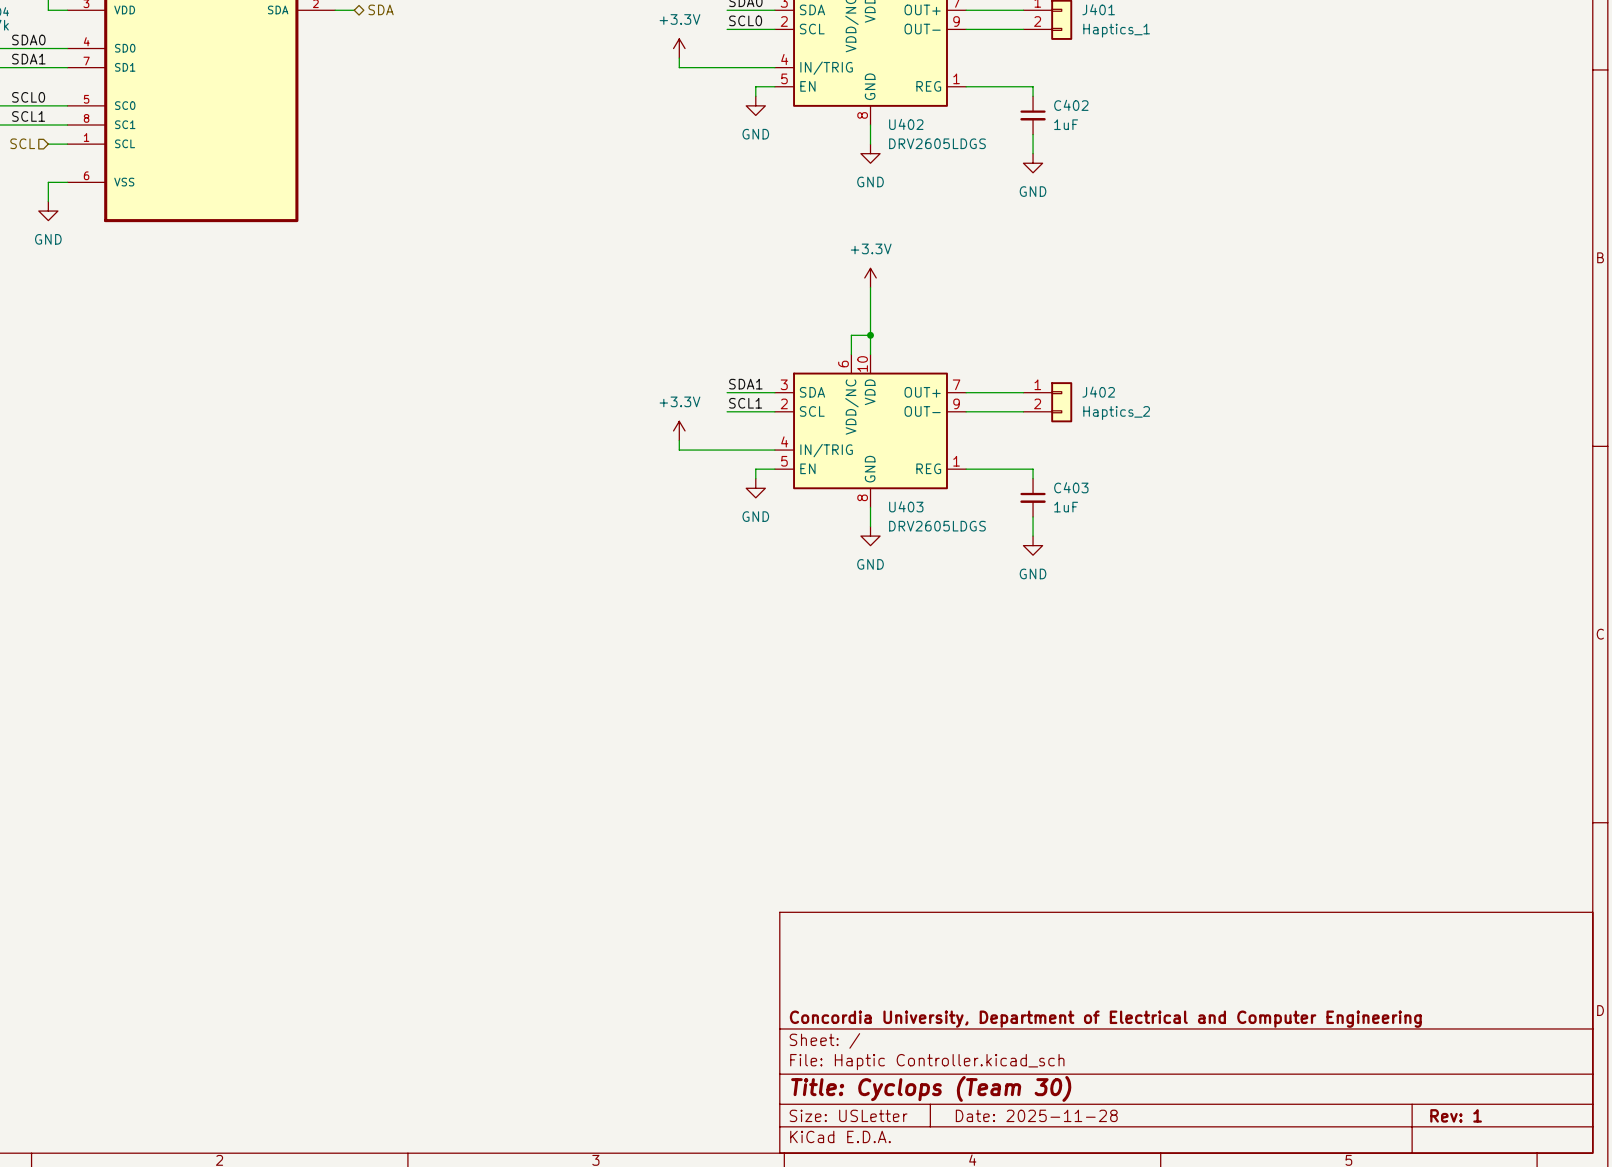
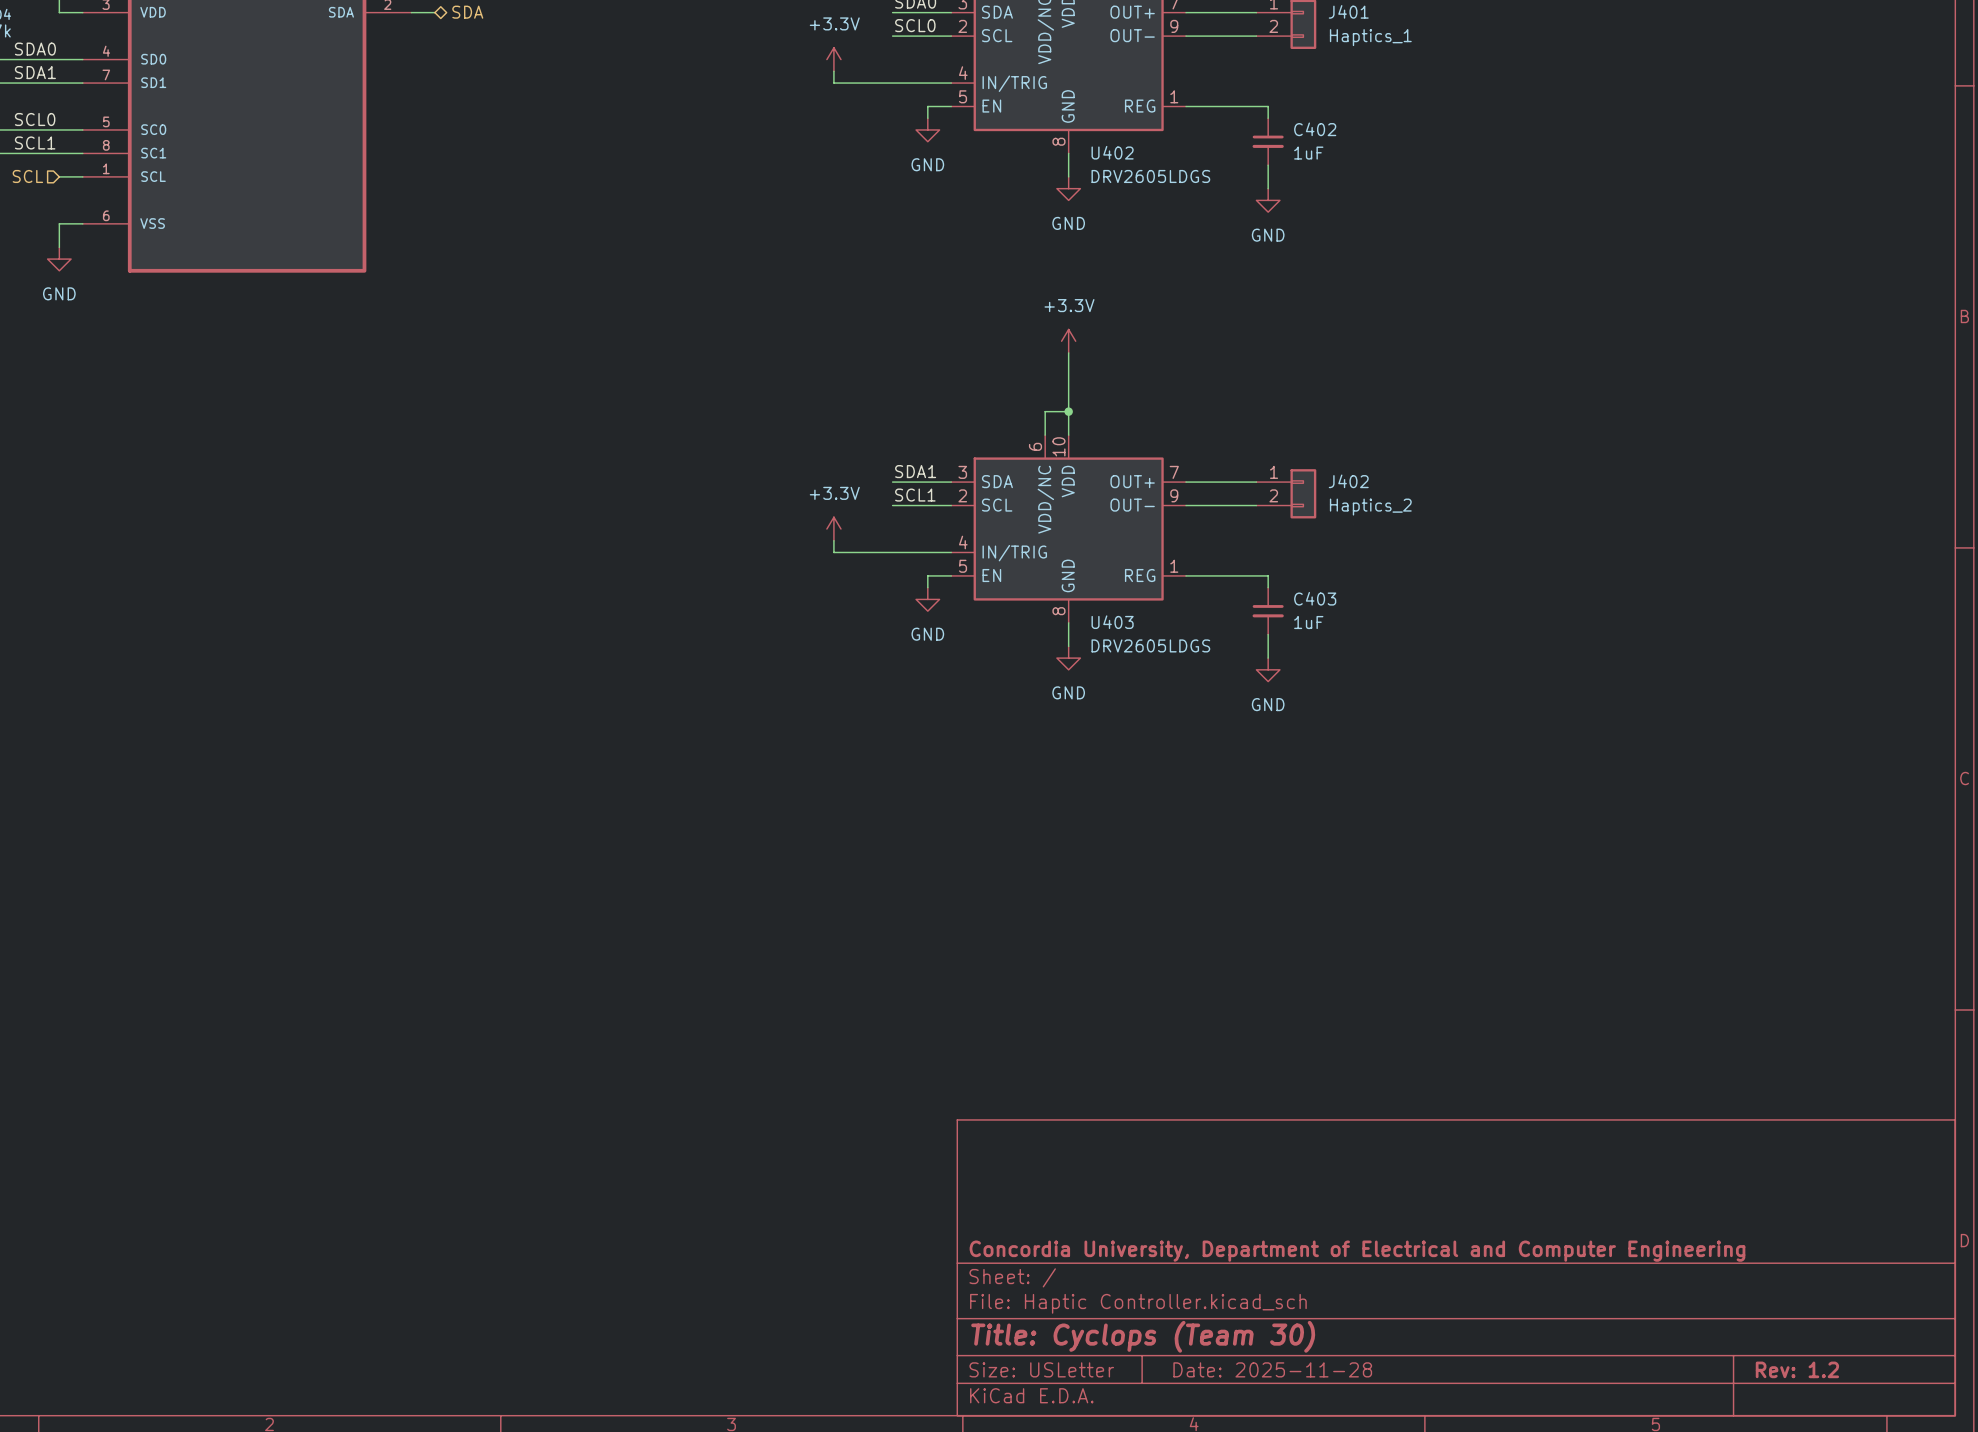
title block: Rev: 1 (1456, 1115) -> Rev: 1.2 (1797, 1369)

